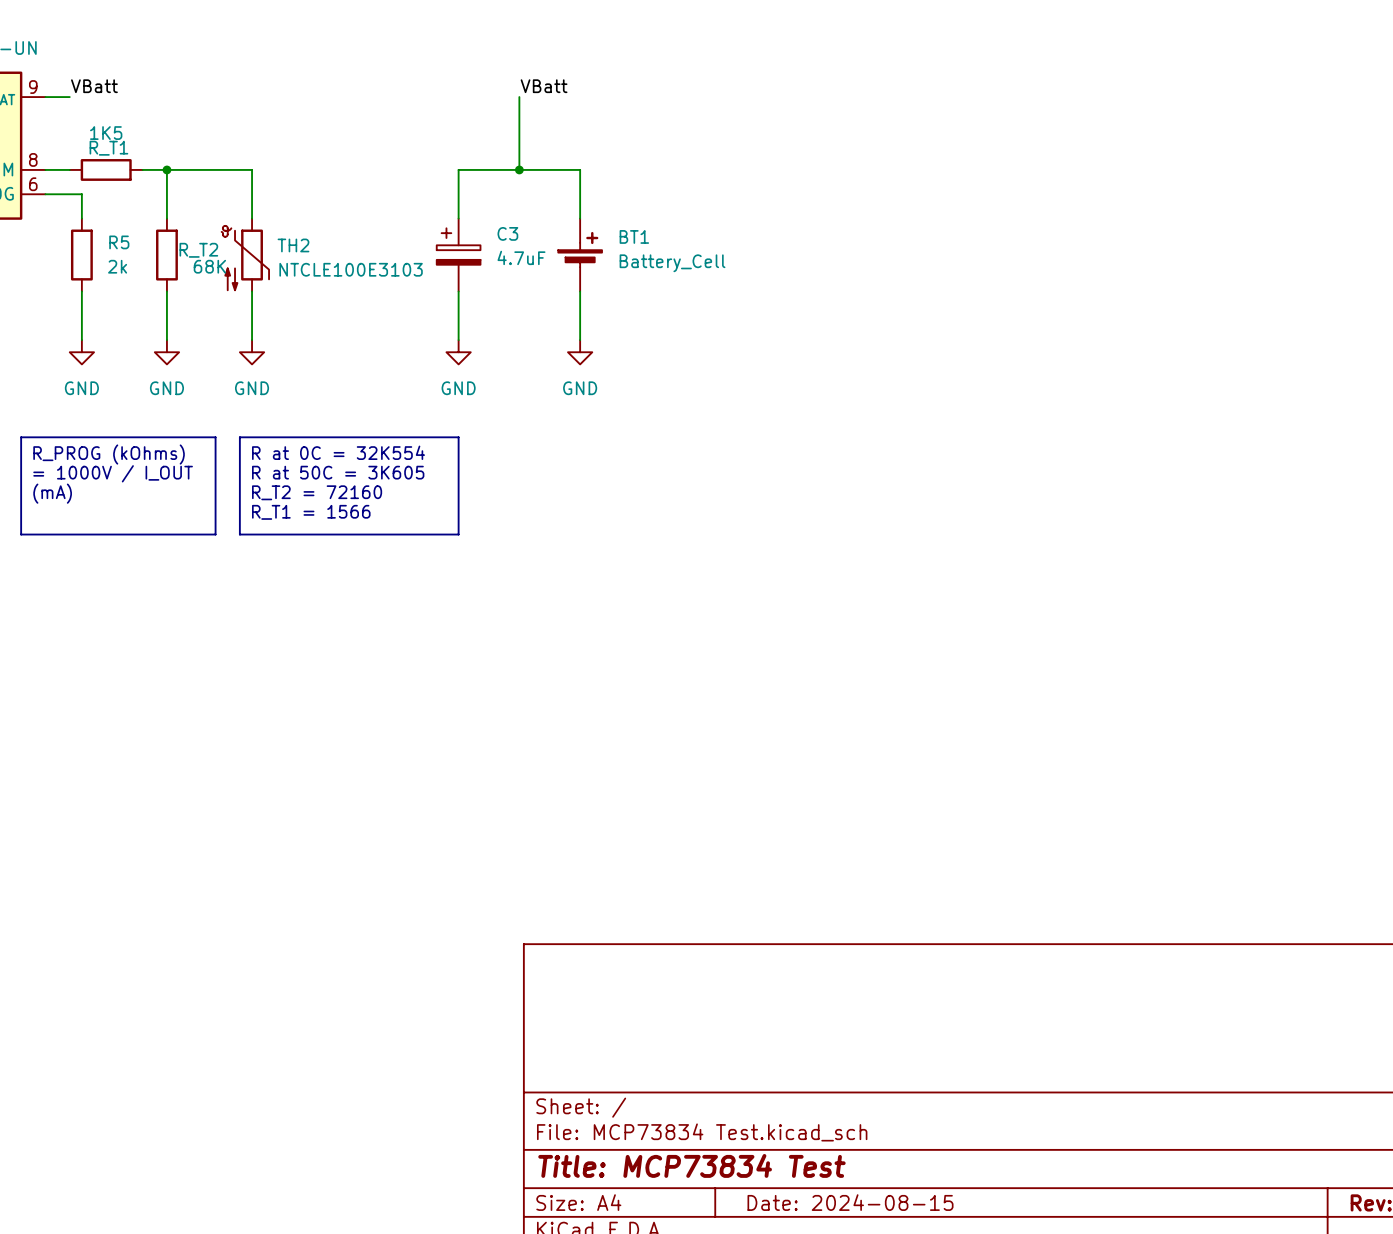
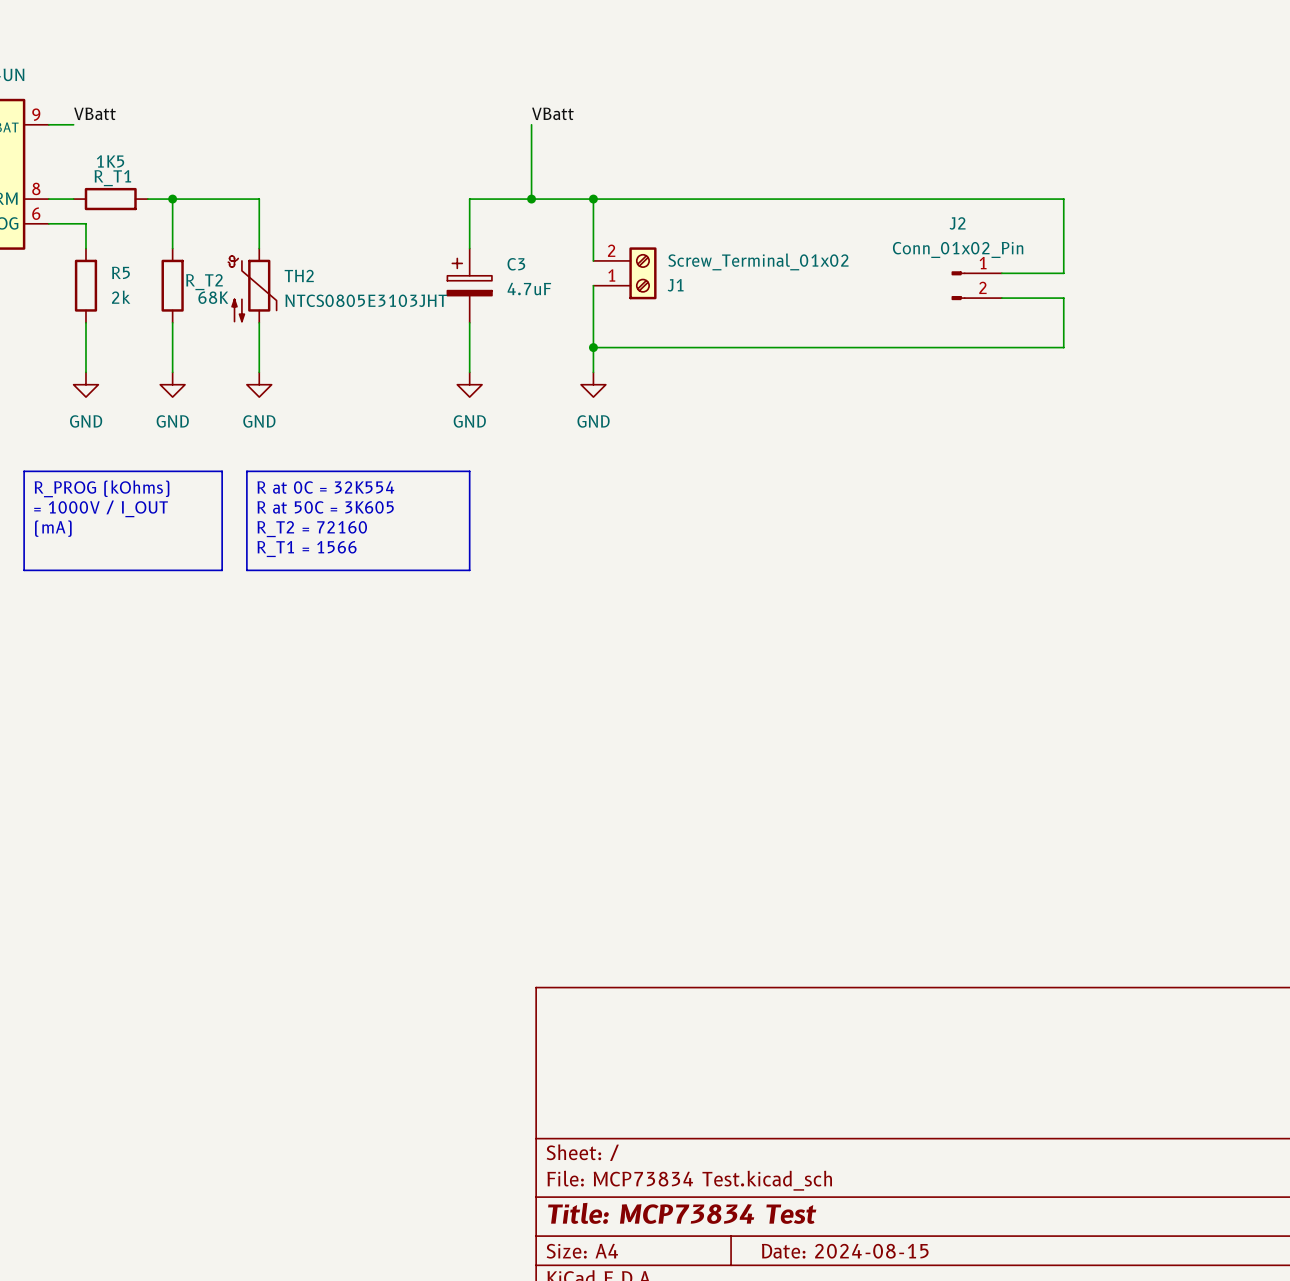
wire: none -> (593, 199) (1063, 199) (1063, 273) (1001, 273)
junction: none -> (593, 199)
J1: none -> Screw_Terminal_01x02 (625, 273)
BT1: Battery_Cell (580, 255) -> none
J2: none -> Conn_01x02_Pin (976, 285)
wire: none -> (1001, 298) (1063, 298) (1063, 347) (593, 347)
TH2 value: NTCLE100E3103 (351, 269) -> NTCS0805E3103JHT (366, 300)
junction: none -> (593, 347)

